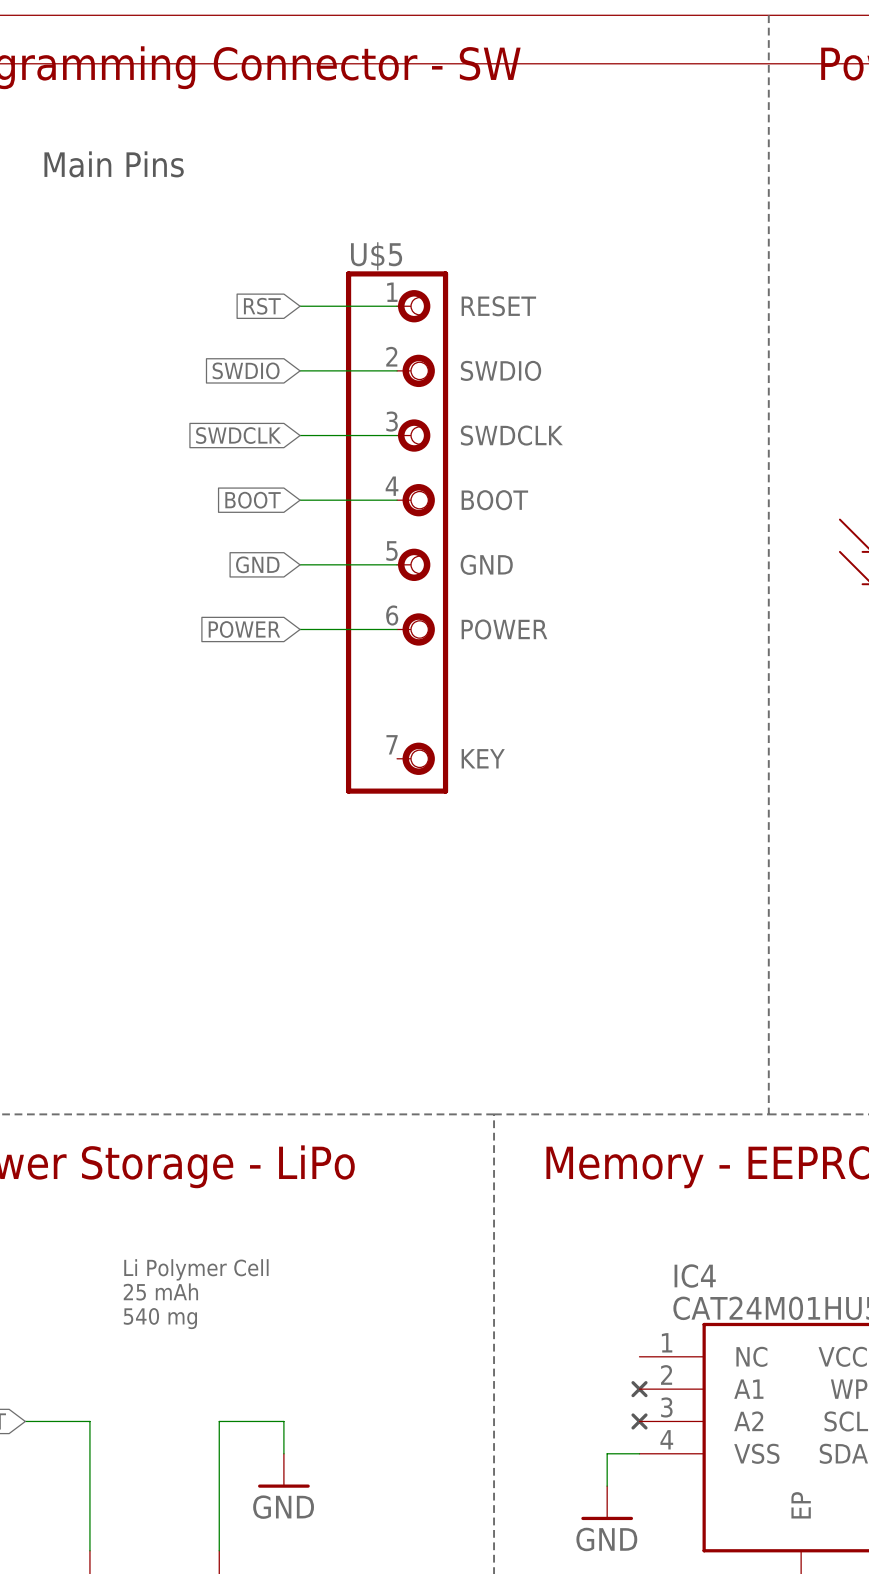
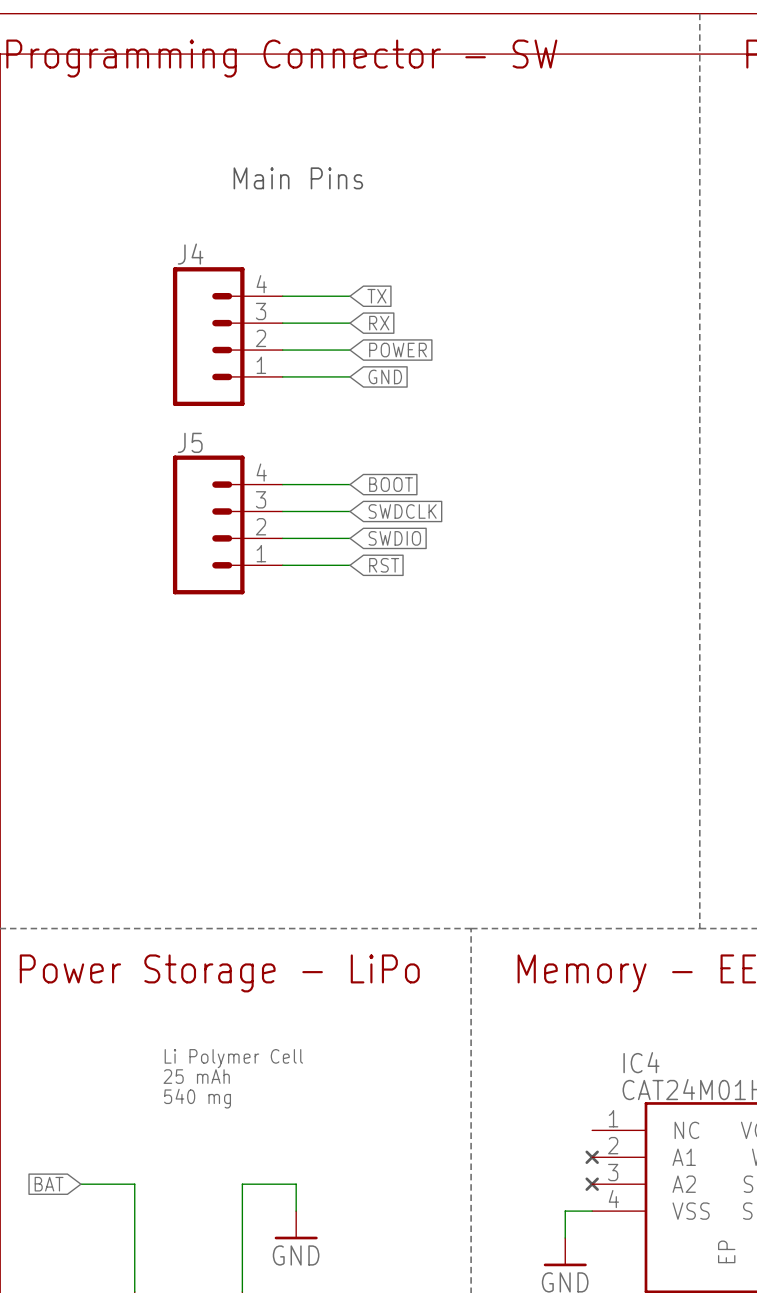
text position: Main Pins (114, 164) -> Main Pins (298, 178)
global label: RST (262, 306) -> none
wire: (300, 306) (397, 306) -> none
wire: none -> (282, 296) (350, 296)
global label: none -> TX (376, 296)
global label rotation: 0° (246, 370) -> 180° (394, 538)
global label position: SWDIO (246, 370) -> SWDIO (394, 538)
wire: (300, 370) (397, 370) -> none
wire: none -> (282, 323) (350, 323)
global label: none -> RX (379, 323)
J4: none -> (227, 336)
wire: none -> (282, 350) (350, 350)
global label rotation: 0° (238, 435) -> 180° (402, 511)
global label position: SWDCLK (238, 435) -> SWDCLK (402, 511)
wire: (300, 435) (397, 435) -> none
wire: none -> (282, 376) (350, 376)
global label rotation: 0° (253, 500) -> 180° (391, 484)
global label position: BOOT (253, 500) -> BOOT (391, 484)
wire: (300, 500) (397, 500) -> none
U$5: (397, 532) -> none
global label rotation: 0° (257, 564) -> 180° (385, 376)
global label position: GND (257, 564) -> GND (385, 376)
wire: (300, 564) (397, 564) -> none
wire: none -> (282, 484) (350, 484)
wire: none -> (282, 511) (350, 511)
J5: none -> (227, 524)
global label rotation: 0° (244, 629) -> 180° (397, 350)
global label position: POWER (244, 629) -> POWER (397, 350)
wire: (300, 629) (397, 629) -> none
wire: none -> (282, 538) (350, 538)
wire: none -> (282, 565) (350, 565)
global label: none -> RST (384, 565)

